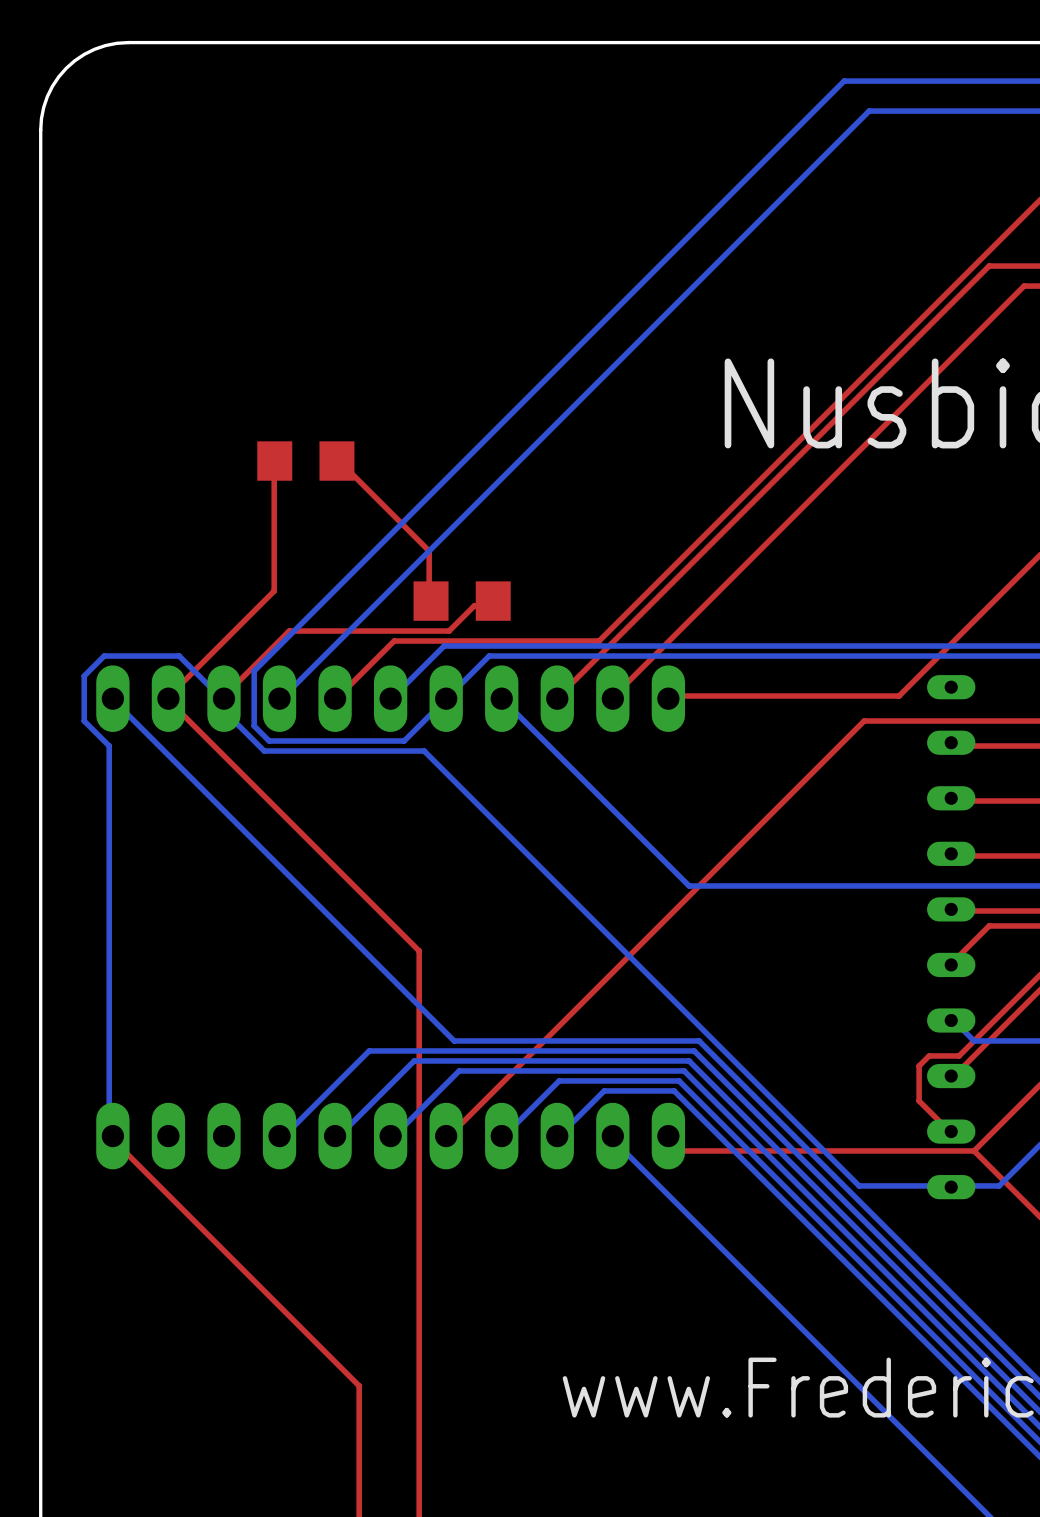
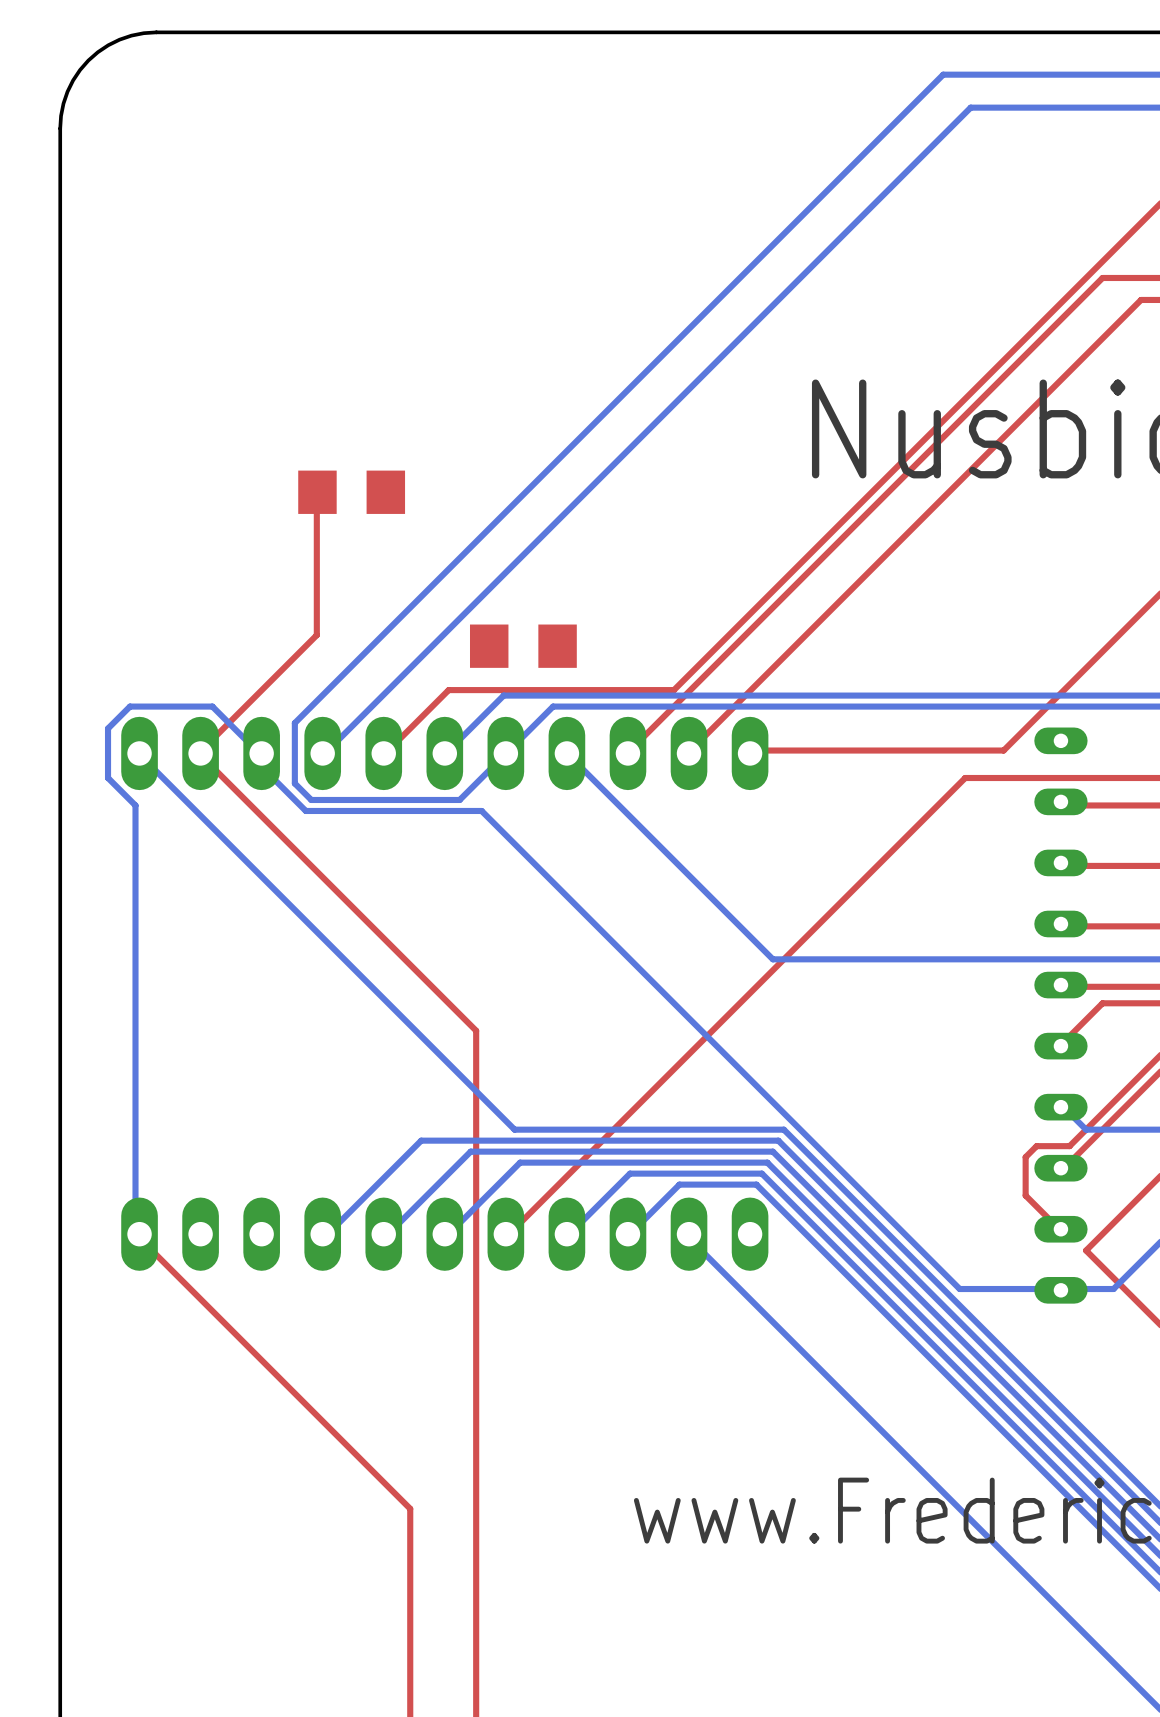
top track: (336, 461) (339, 461) (429, 551) (429, 601) (431, 601) -> none
top track: (493, 601) (489, 606) (474, 606) (449, 631) (289, 631) (224, 696) (223, 698) -> none
top track: (668, 1136) (669, 1140) (679, 1150) (974, 1150) -> none

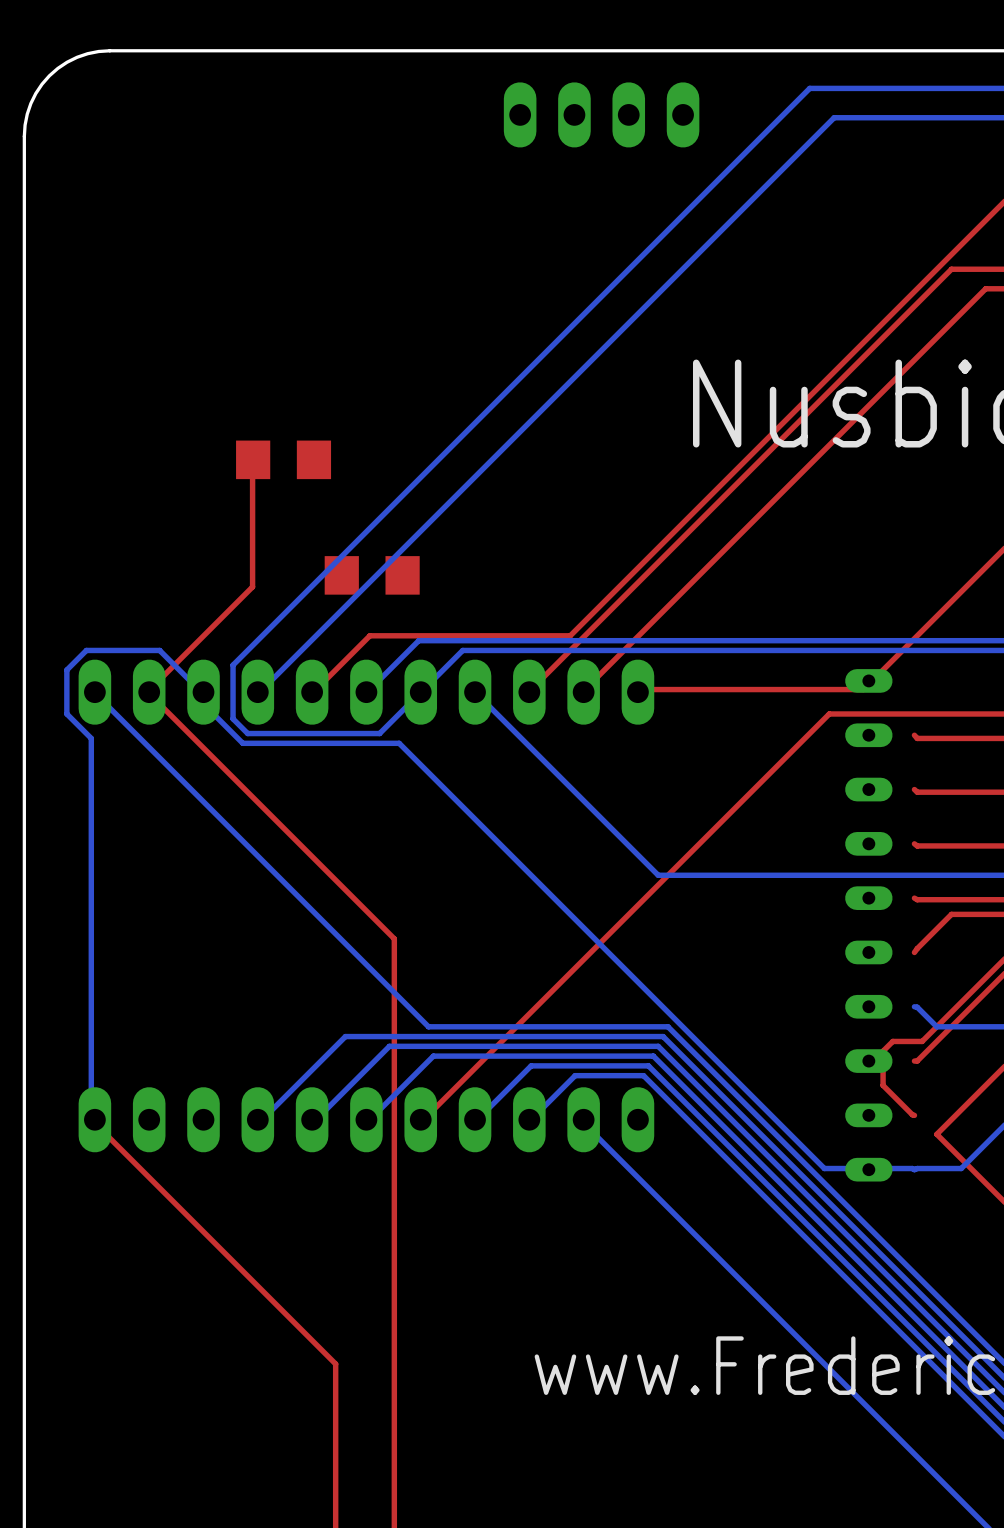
part: none -> (601, 114)
part position: (523, 646) -> (372, 575)
part position: (1060, 1015) -> (868, 925)

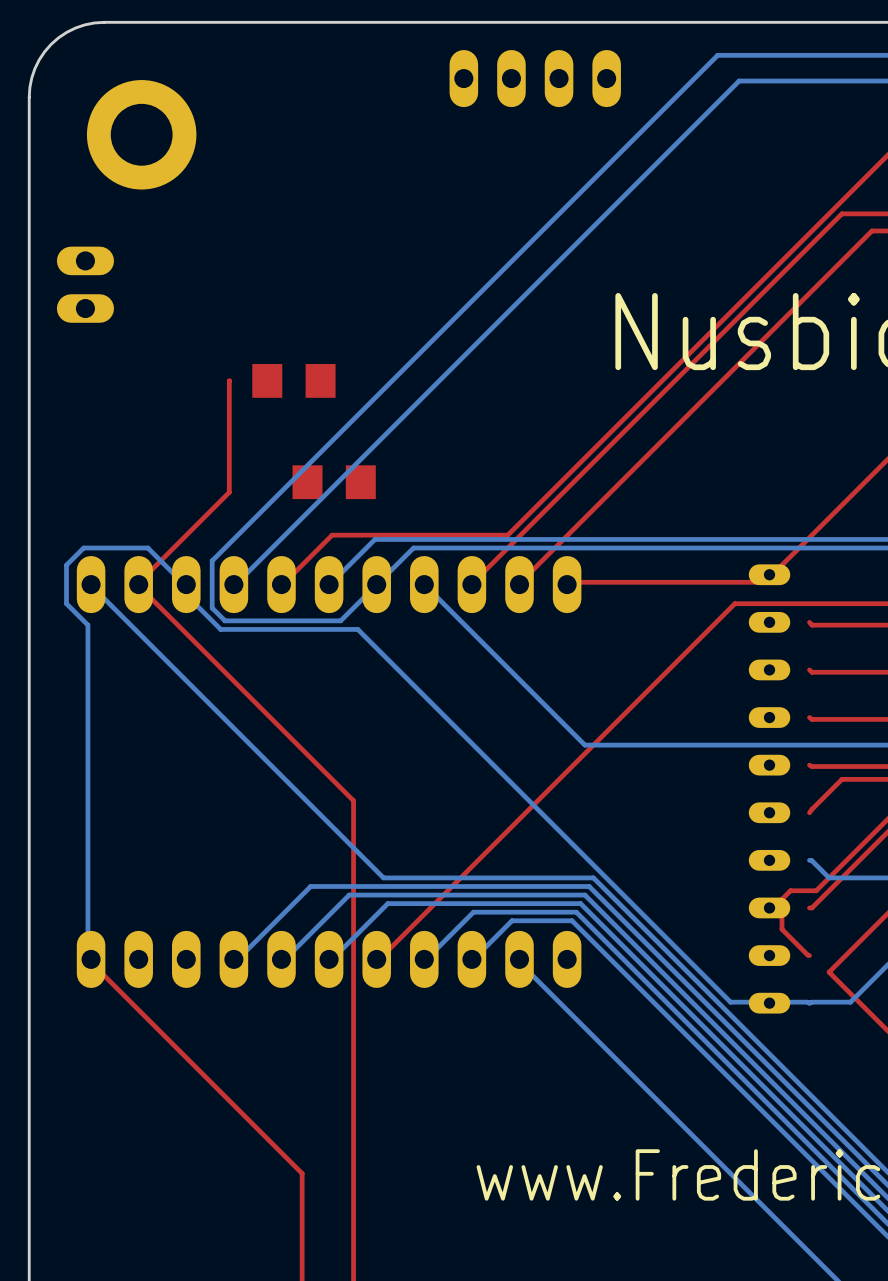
part: none -> (141, 134)
part: none -> (85, 284)
part position: (283, 459) -> (293, 380)

